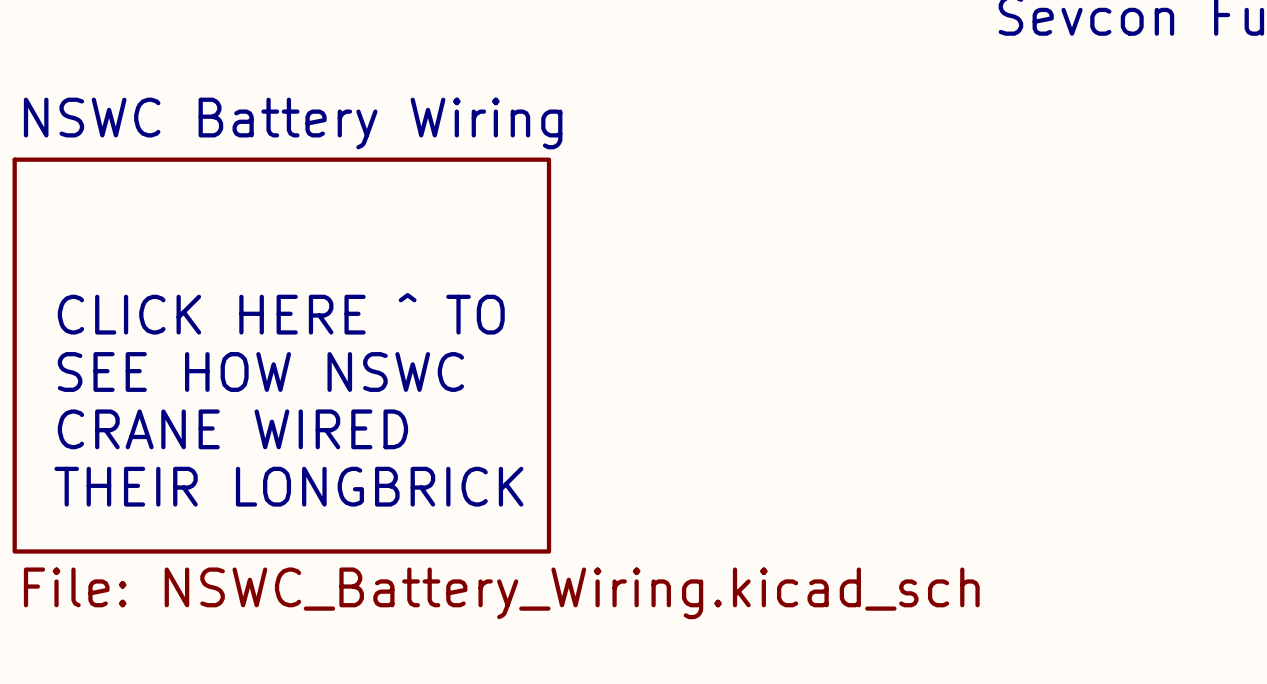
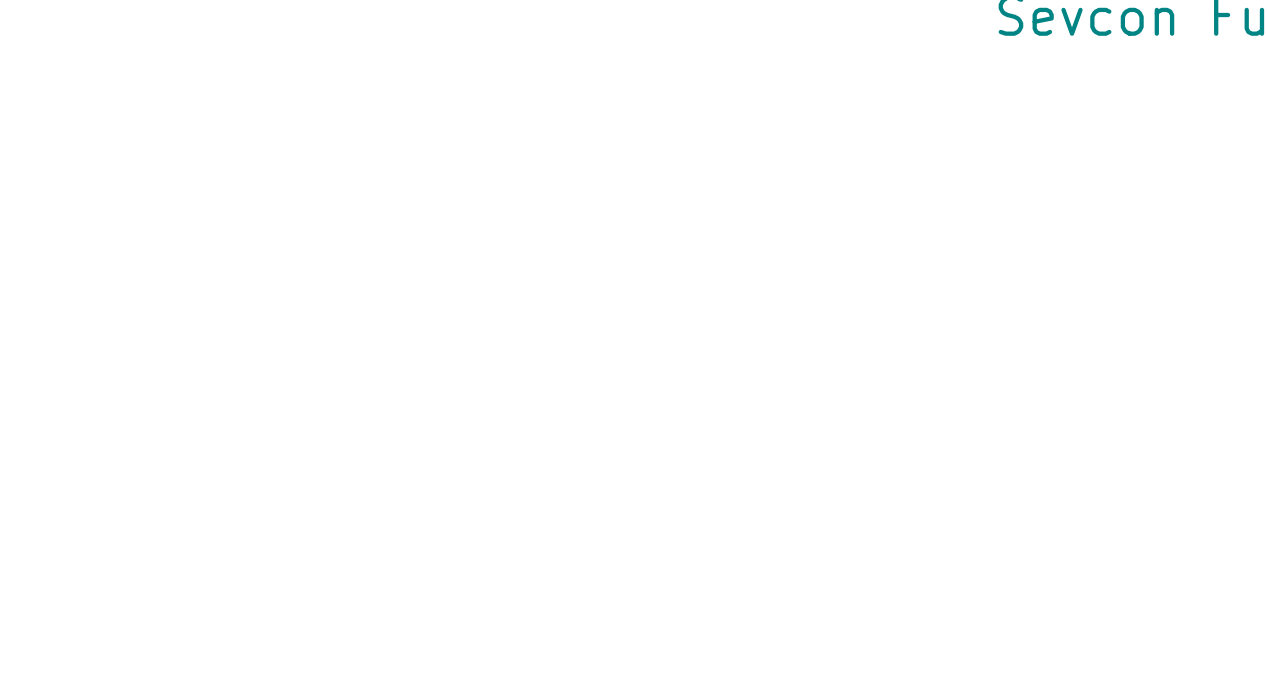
text: CLICK HERE ^ TO (281, 313) -> none
sheet NSWC Battery Wiring: File: NSWC_Battery_Wiring.kicad_sch (281, 355) -> none
text: SEE HOW NSWC (260, 371) -> none
text: CRANE WIRED (232, 429) -> none
text: THEIR LONGBRICK (288, 486) -> none

